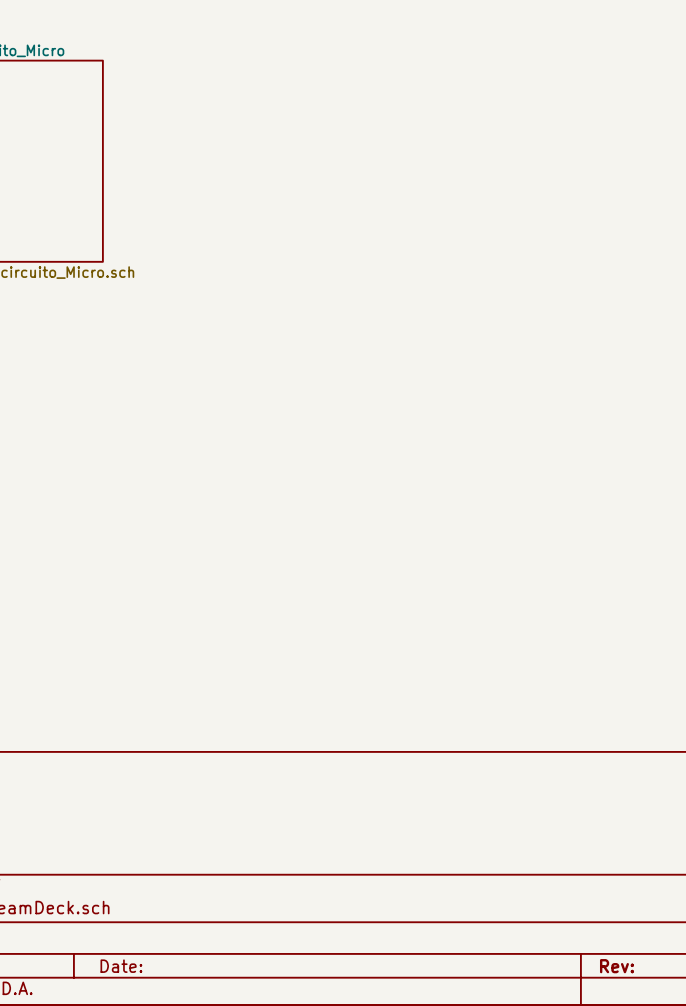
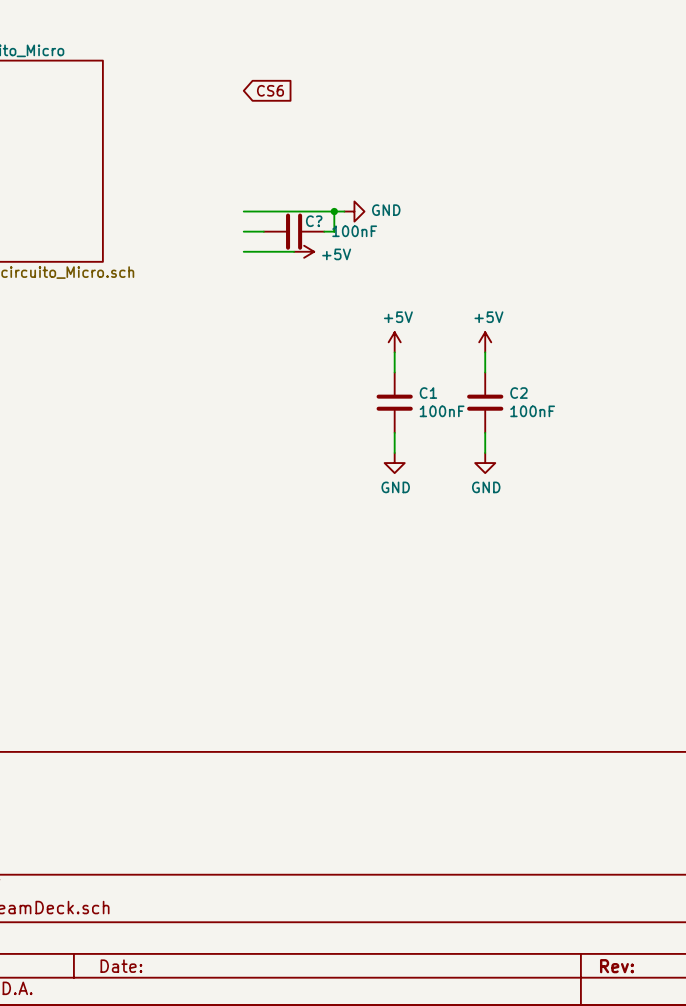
global label: none -> CS6 (270, 90)
wire: none -> (243, 211) (344, 211)
wire: none -> (334, 211) (334, 231) (324, 231)
junction: none -> (334, 211)
power symbol: none -> GND (354, 211)
wire: none -> (243, 231) (263, 231)
C?: none -> 100nF (294, 231)
wire: none -> (243, 251) (294, 251)
power symbol: none -> +5V (304, 251)
power symbol: none -> +5V (394, 342)
power symbol: none -> +5V (485, 342)
wire: none -> (394, 352) (394, 372)
wire: none -> (485, 352) (485, 372)
C1: none -> 100nF (394, 402)
C2: none -> 100nF (485, 402)
wire: none -> (394, 432) (394, 452)
wire: none -> (485, 432) (485, 452)
power symbol: none -> GND (394, 463)
power symbol: none -> GND (485, 463)

